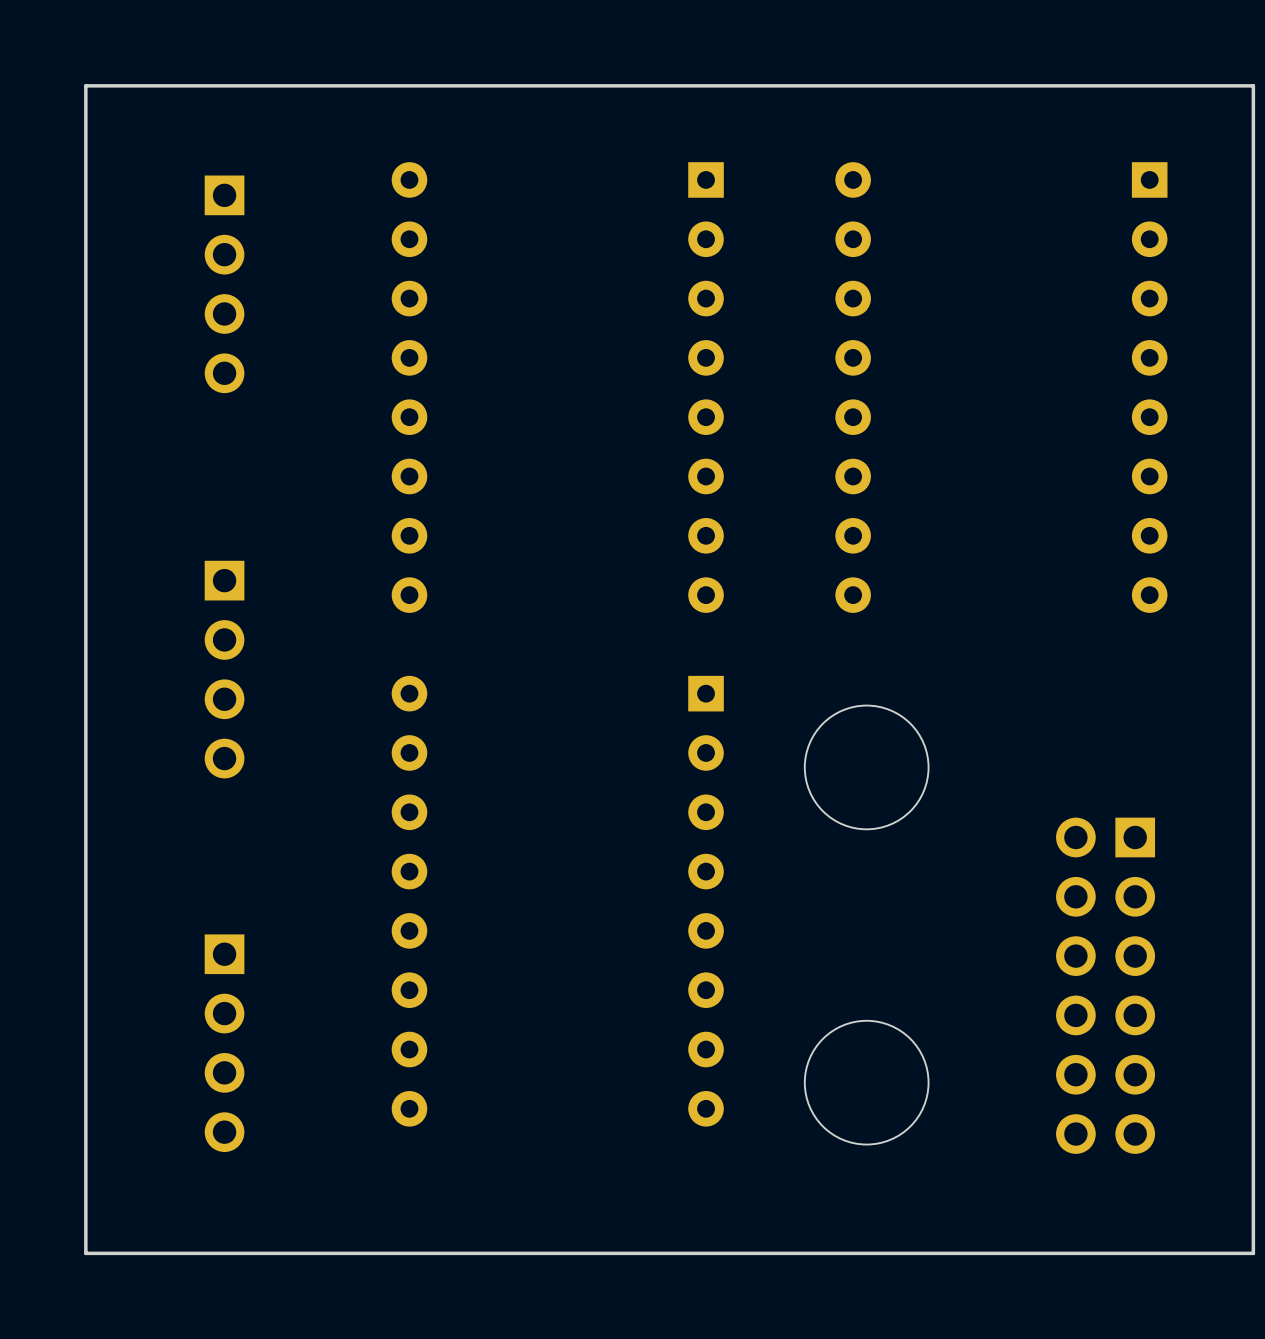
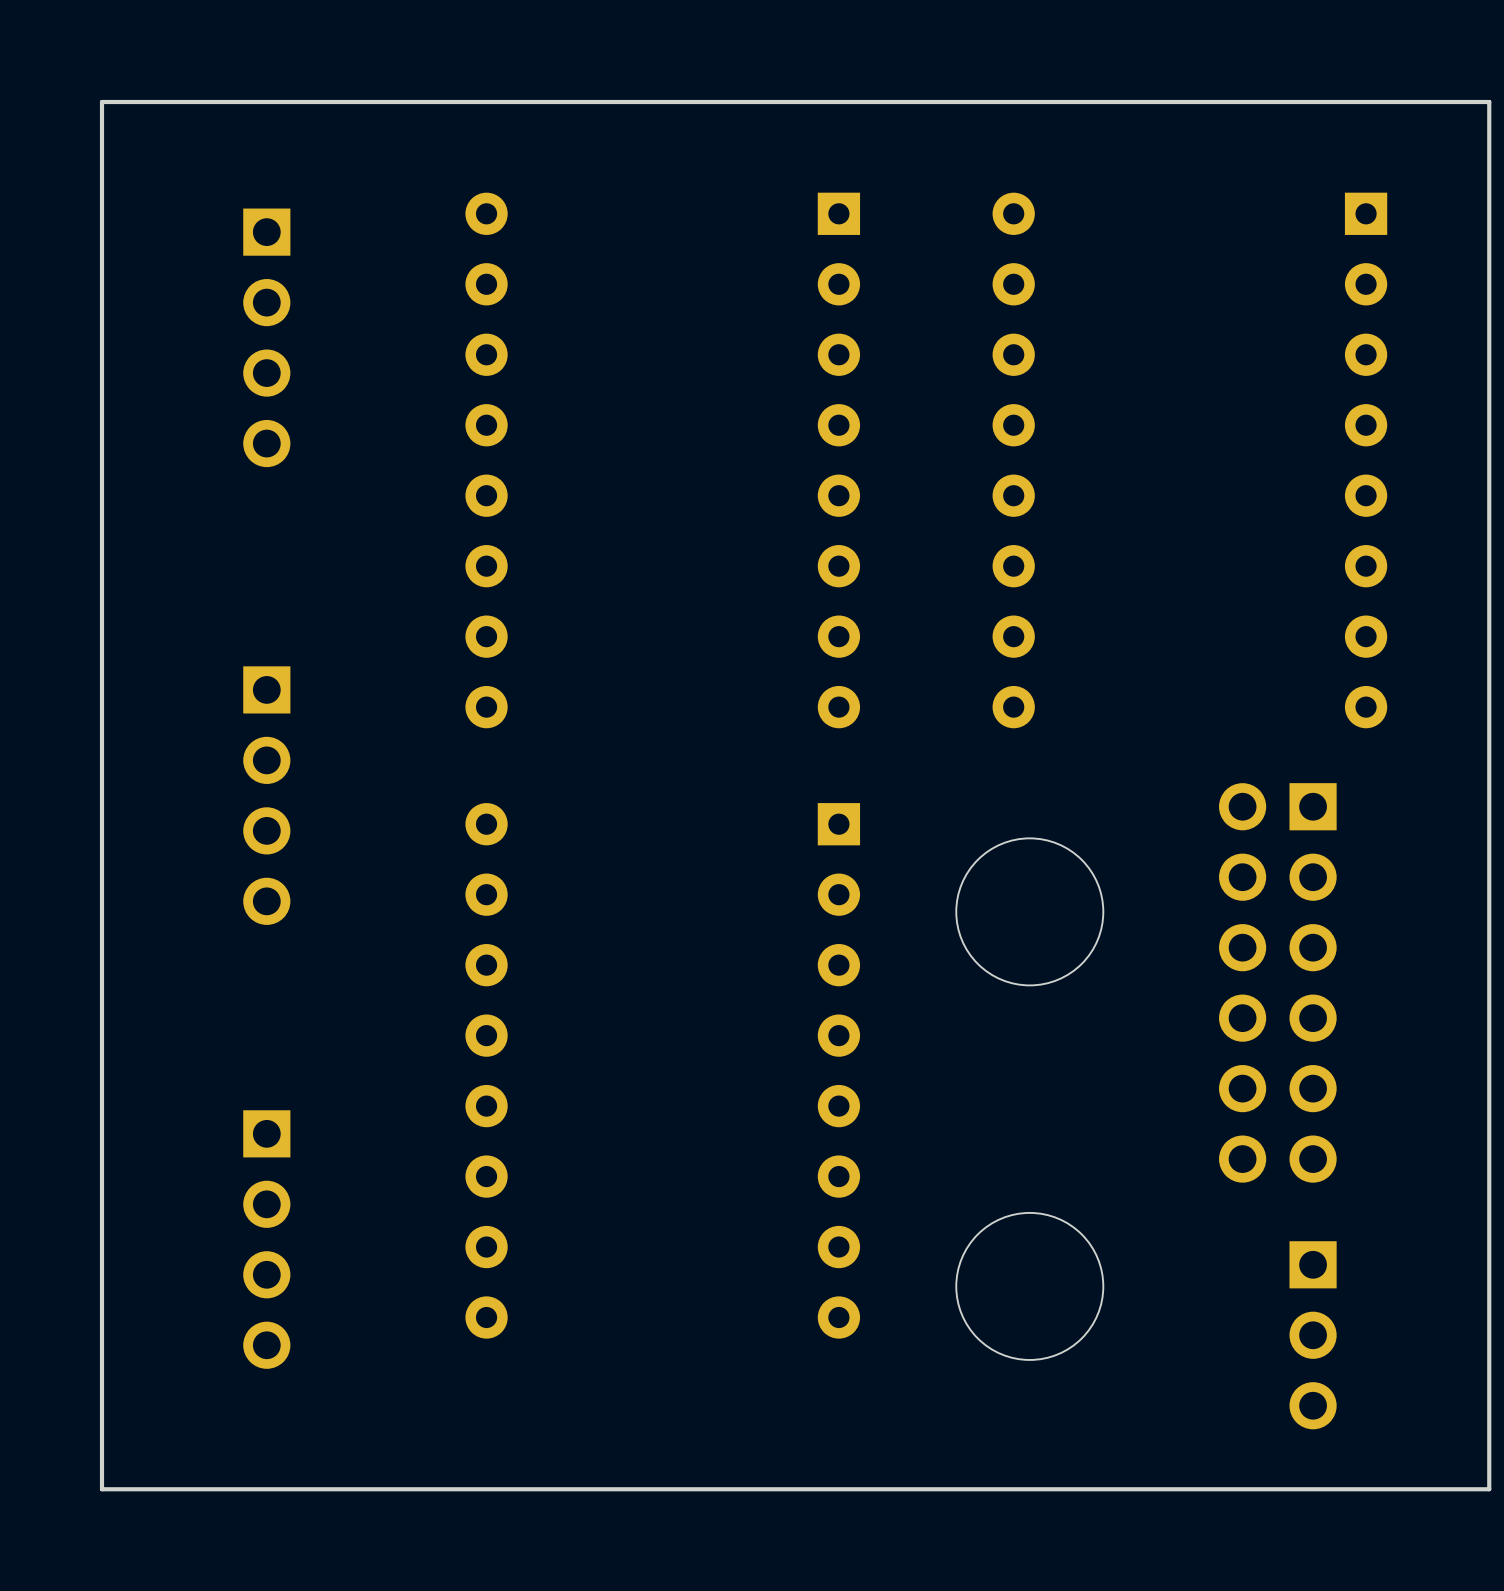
part position: (1105, 985) -> (1277, 982)
part: none -> (1313, 1335)

